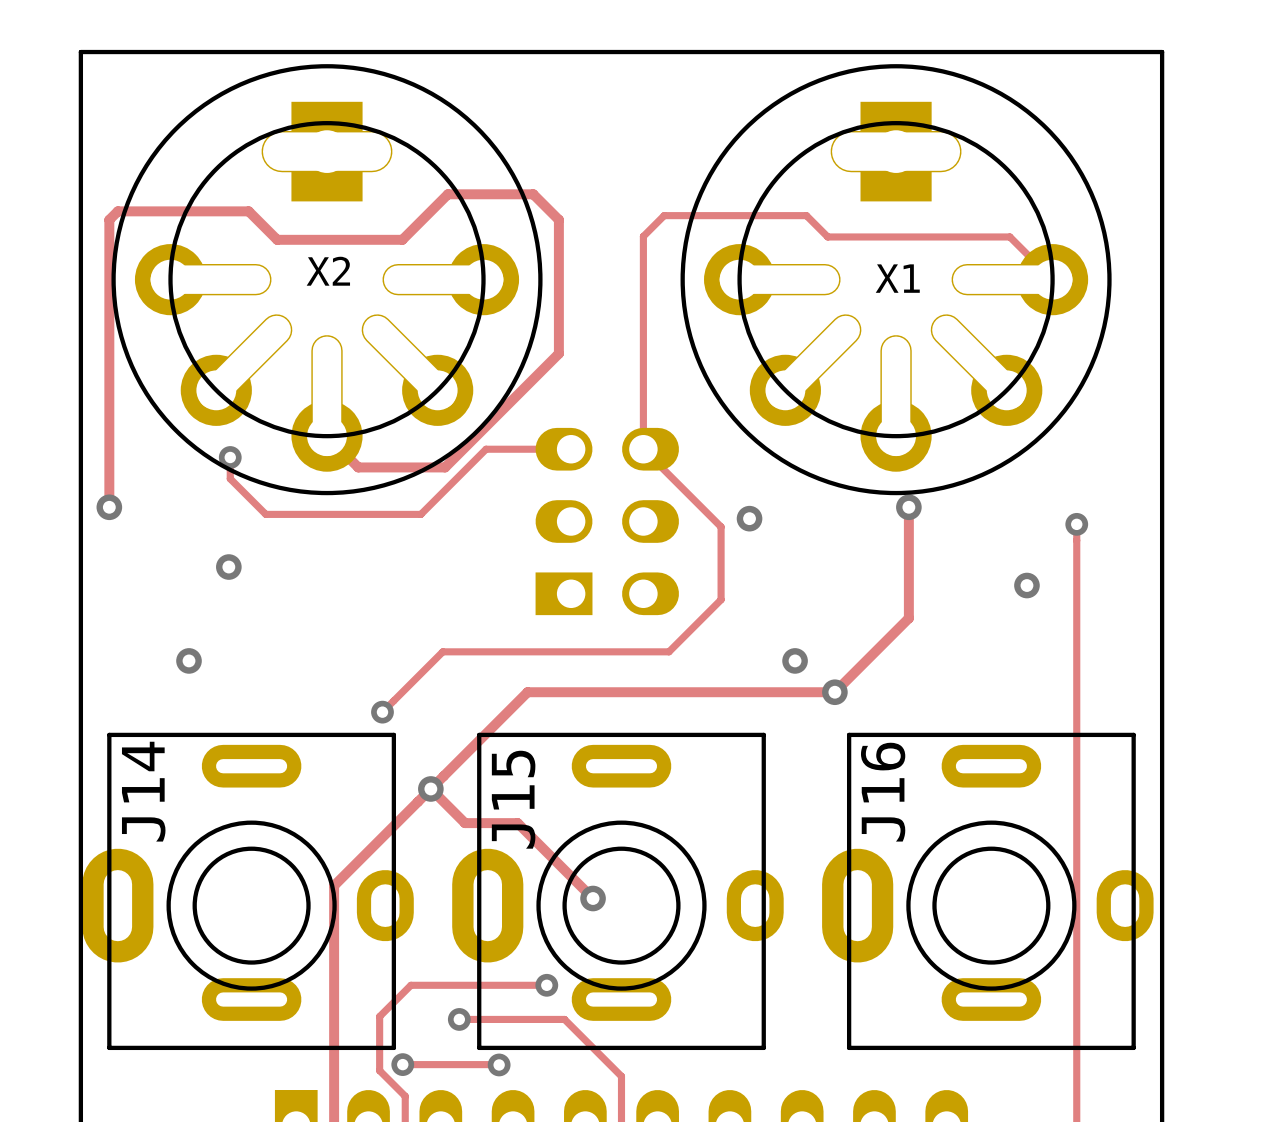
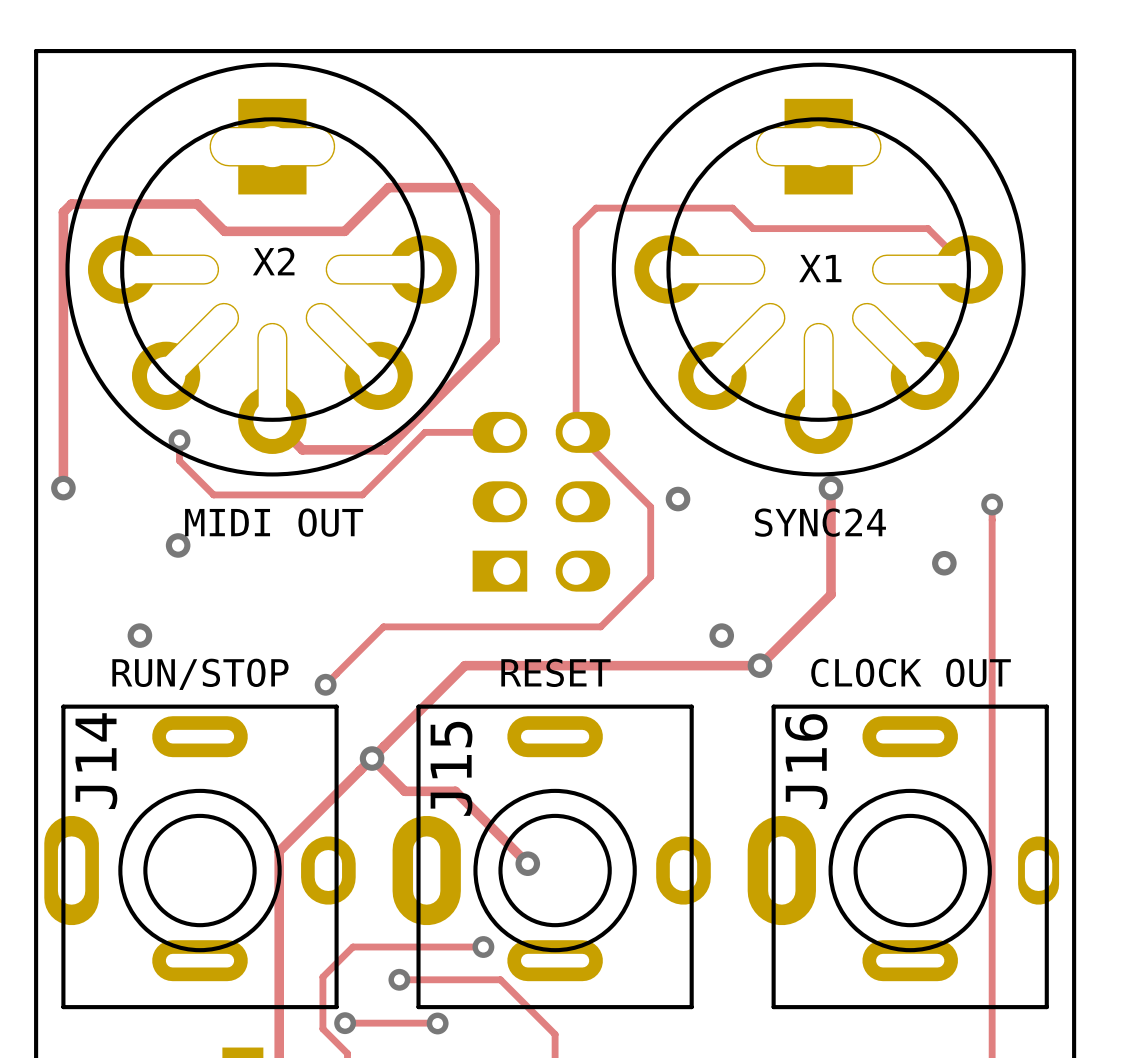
text: none -> MIDI OUT (274, 522)
text: none -> SYNC24 (820, 522)
text: none -> RESET (555, 672)
text: none -> CLOCK OUT (911, 672)
text: none -> RUN/STOP (200, 674)
J14 footprint: [82, 732, 414, 1051] -> [44, 704, 356, 1010]
J16 footprint: [822, 732, 1154, 1051] -> [747, 704, 1060, 1010]

